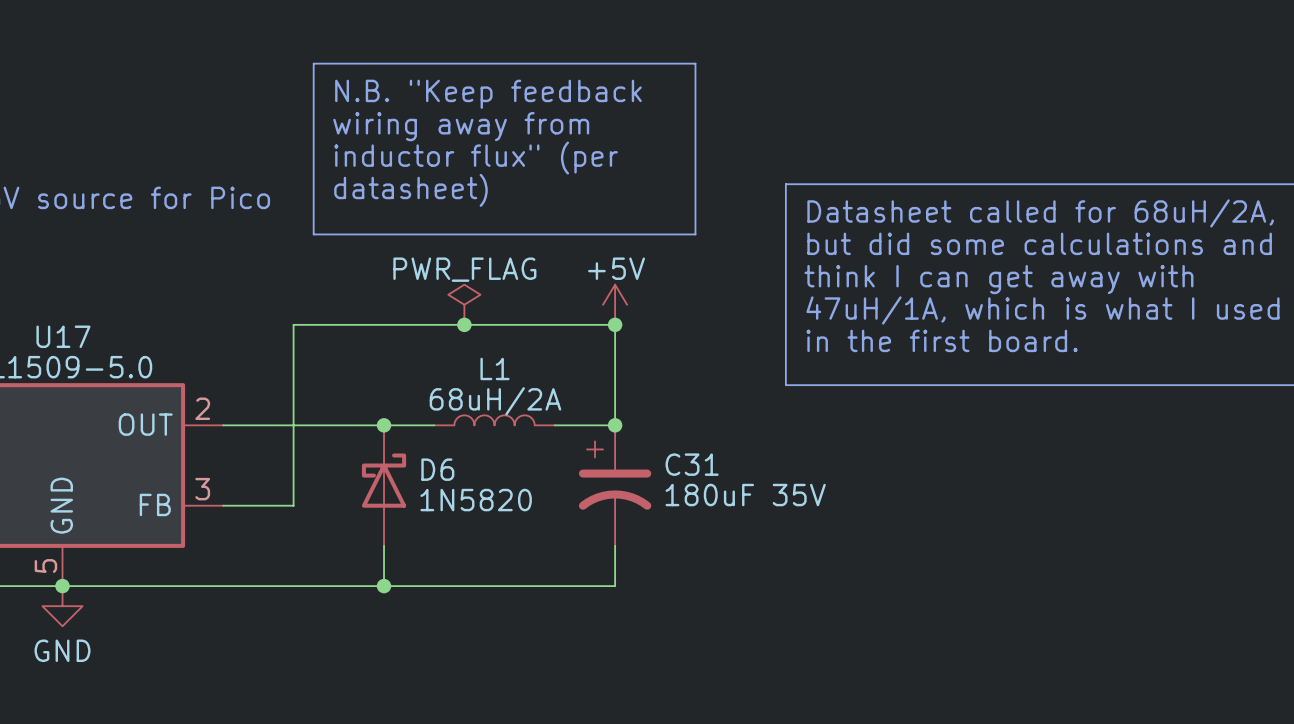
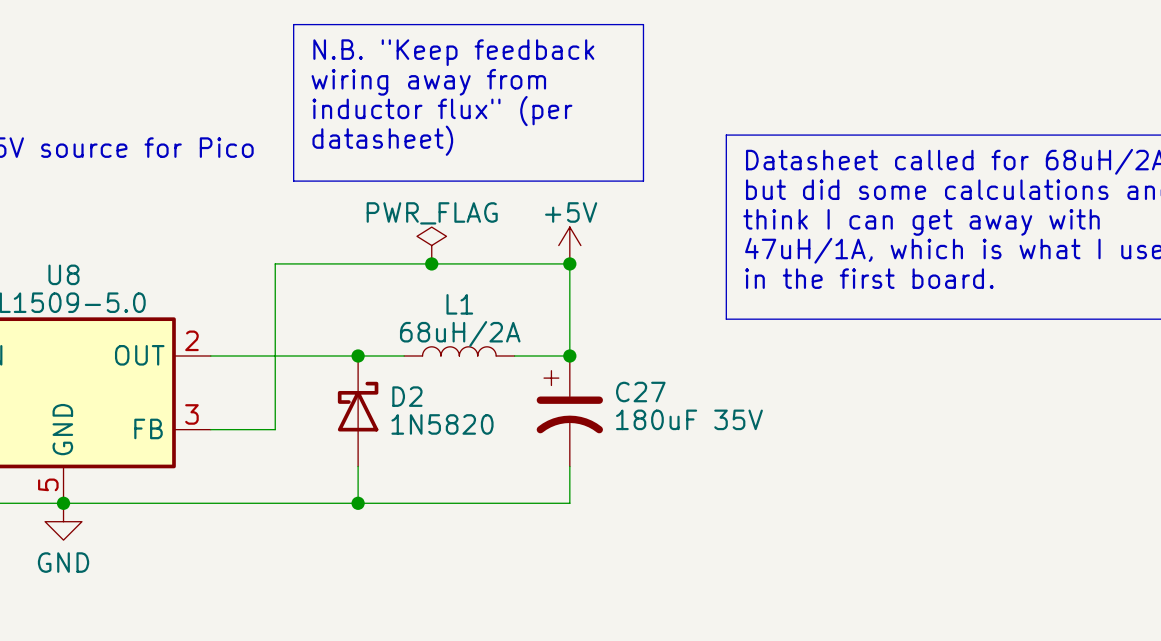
U17 name: U17 (63, 336) -> U8 (63, 274)
C31 name: C31 (692, 464) -> C27 (640, 392)
D6 name: D6 (437, 469) -> D2 (407, 396)

